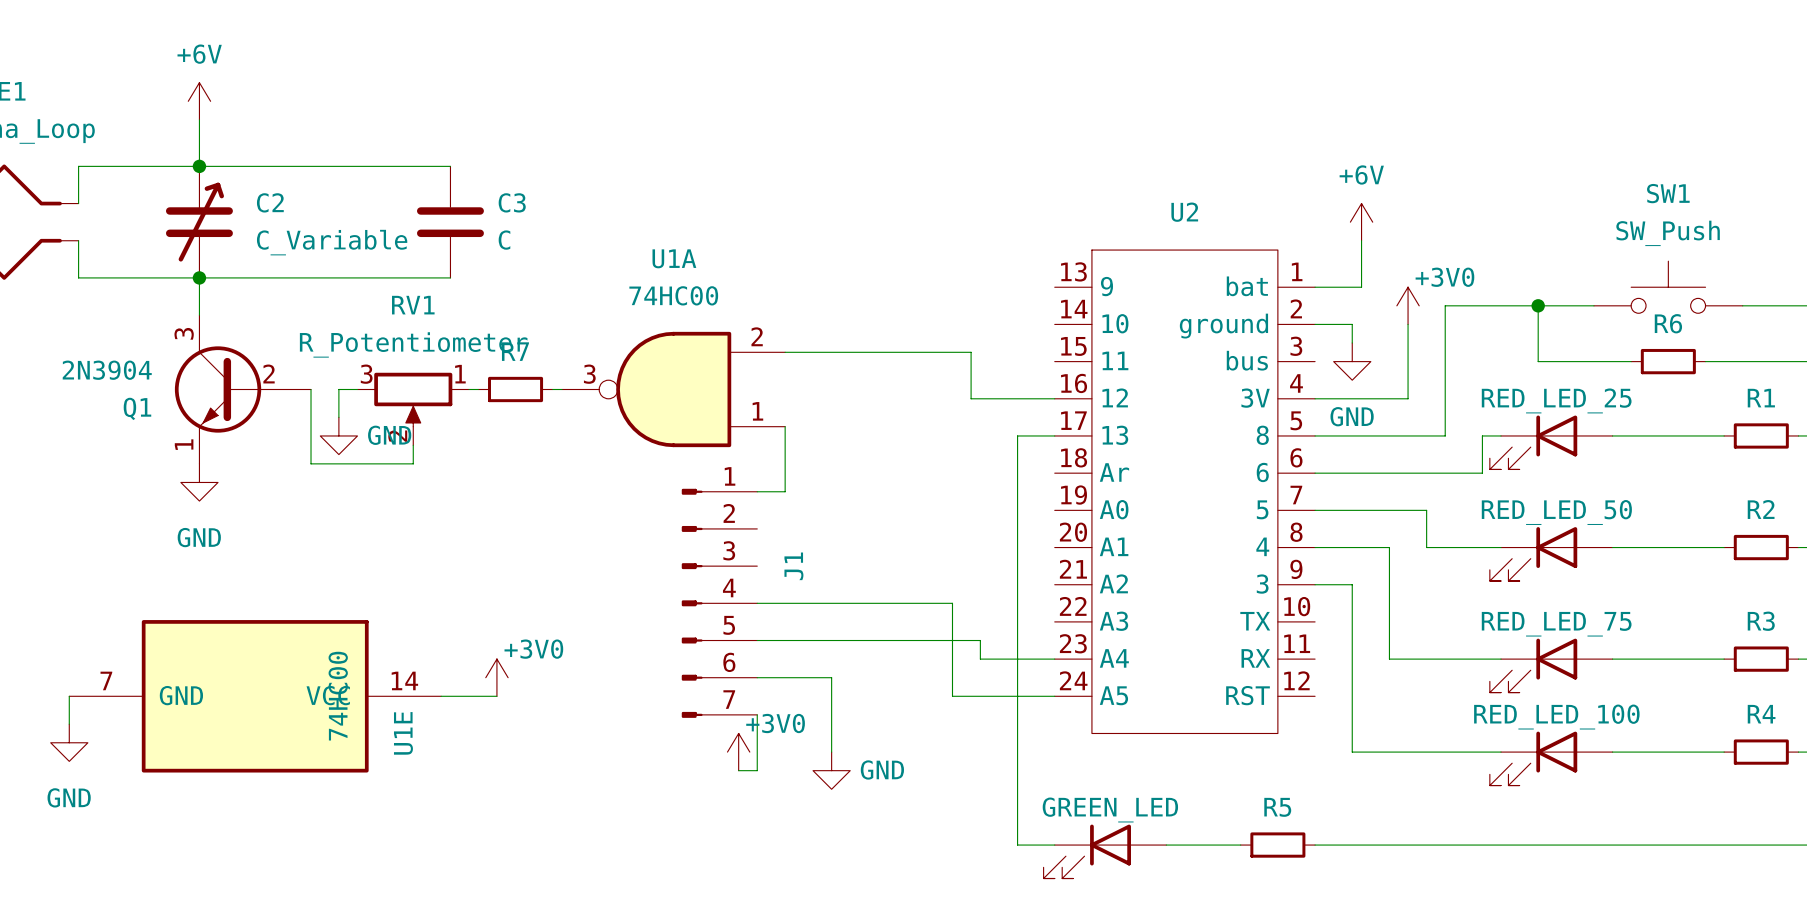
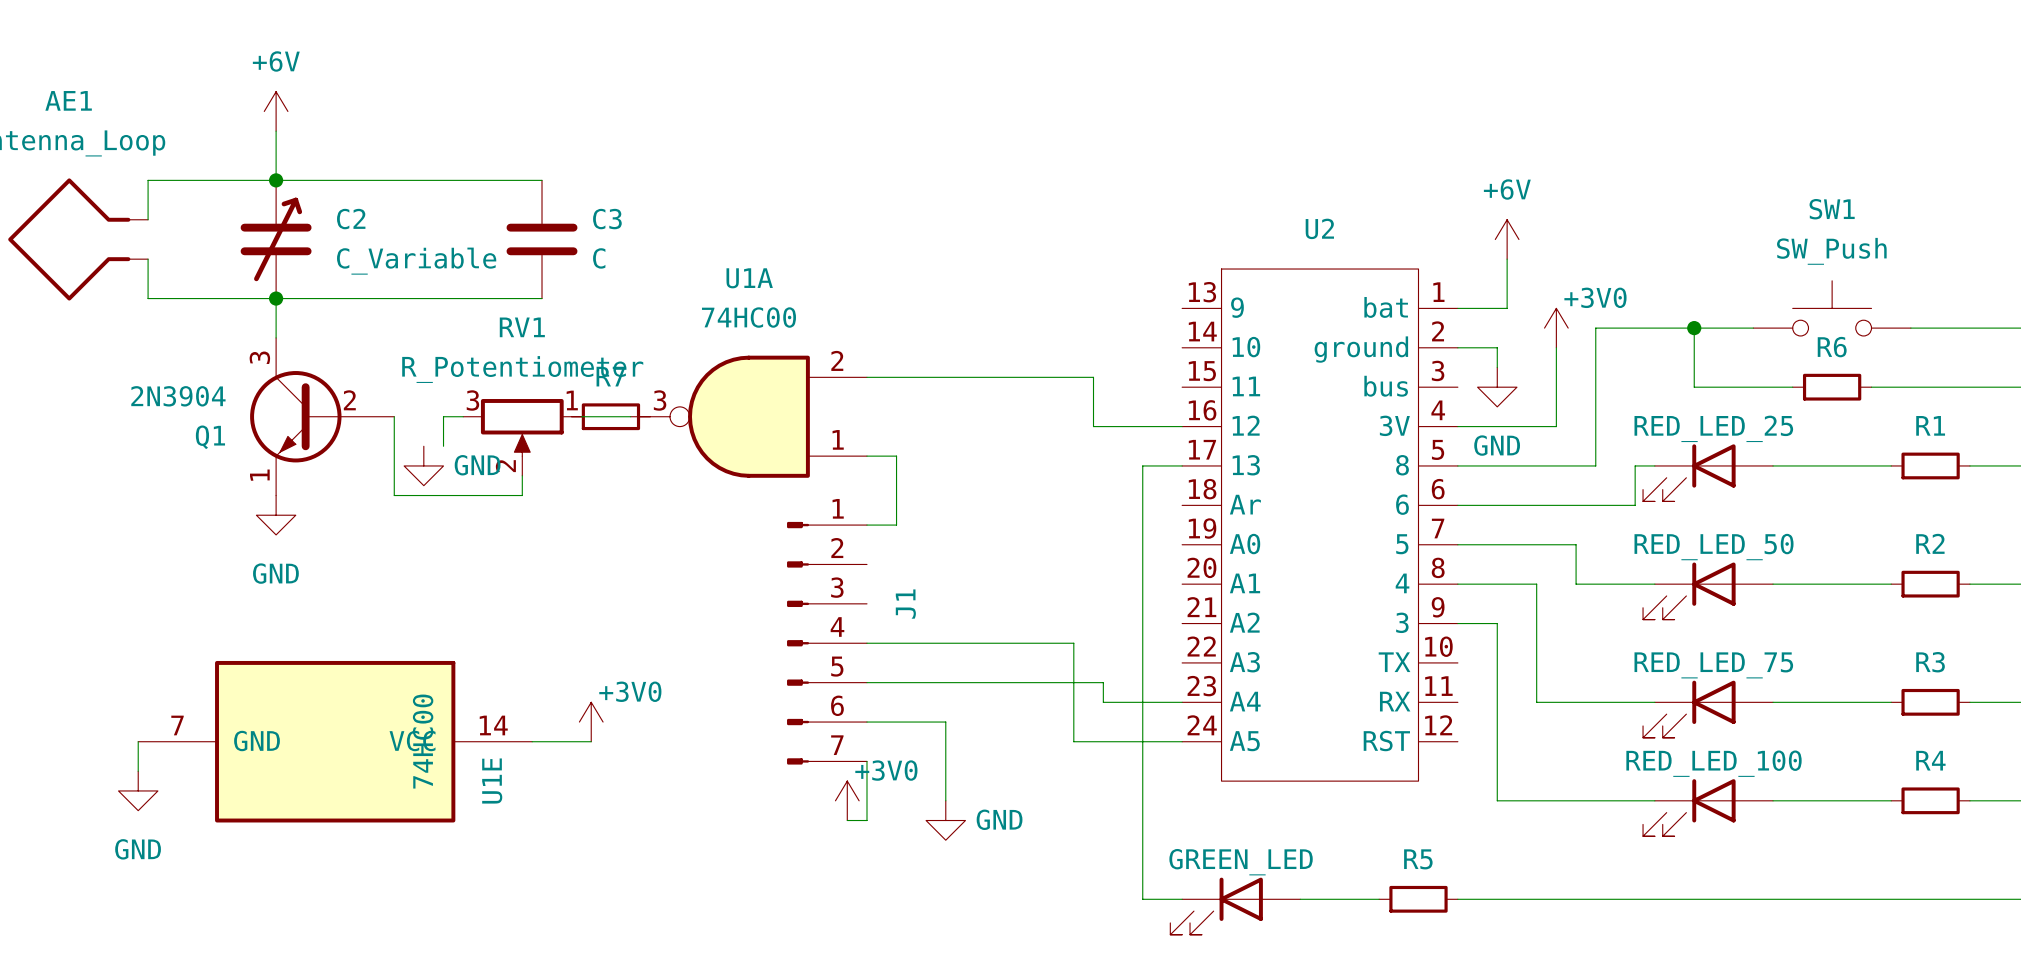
wire: (357, 389) (338, 389) (338, 417) -> (463, 416) (443, 416) (443, 446)
wire: none -> (581, 416) (630, 416)
U1A position: (673, 389) -> (748, 416)
RV1 position: (413, 409) -> (522, 437)
wire: (413, 445) (413, 463) -> (522, 475) (522, 495) (502, 495)

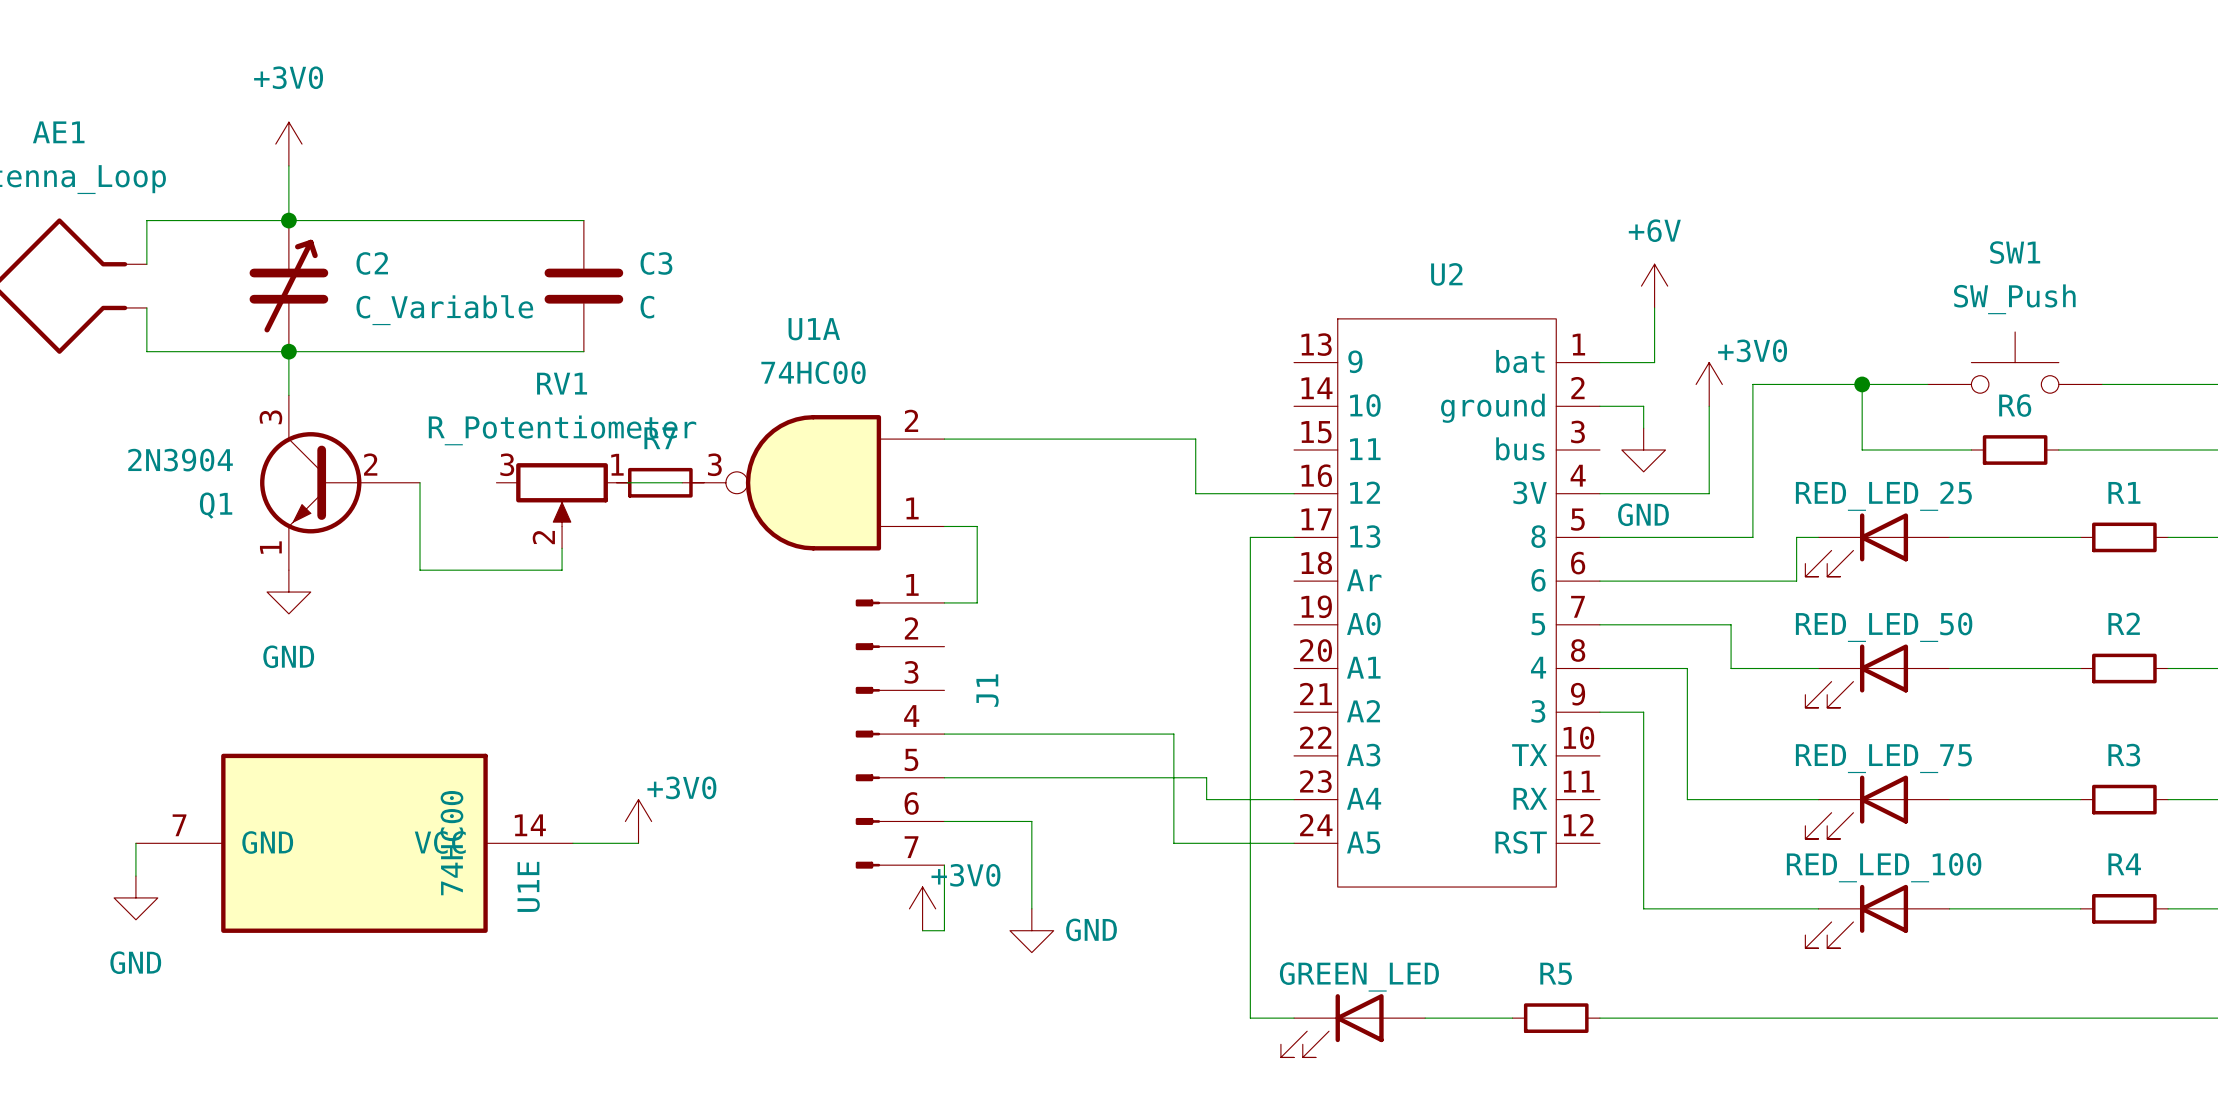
power symbol: +6V (276, 111) -> +3V0 (288, 144)
wire: (463, 416) (443, 416) (443, 446) -> none
power symbol: GND (423, 465) -> none

